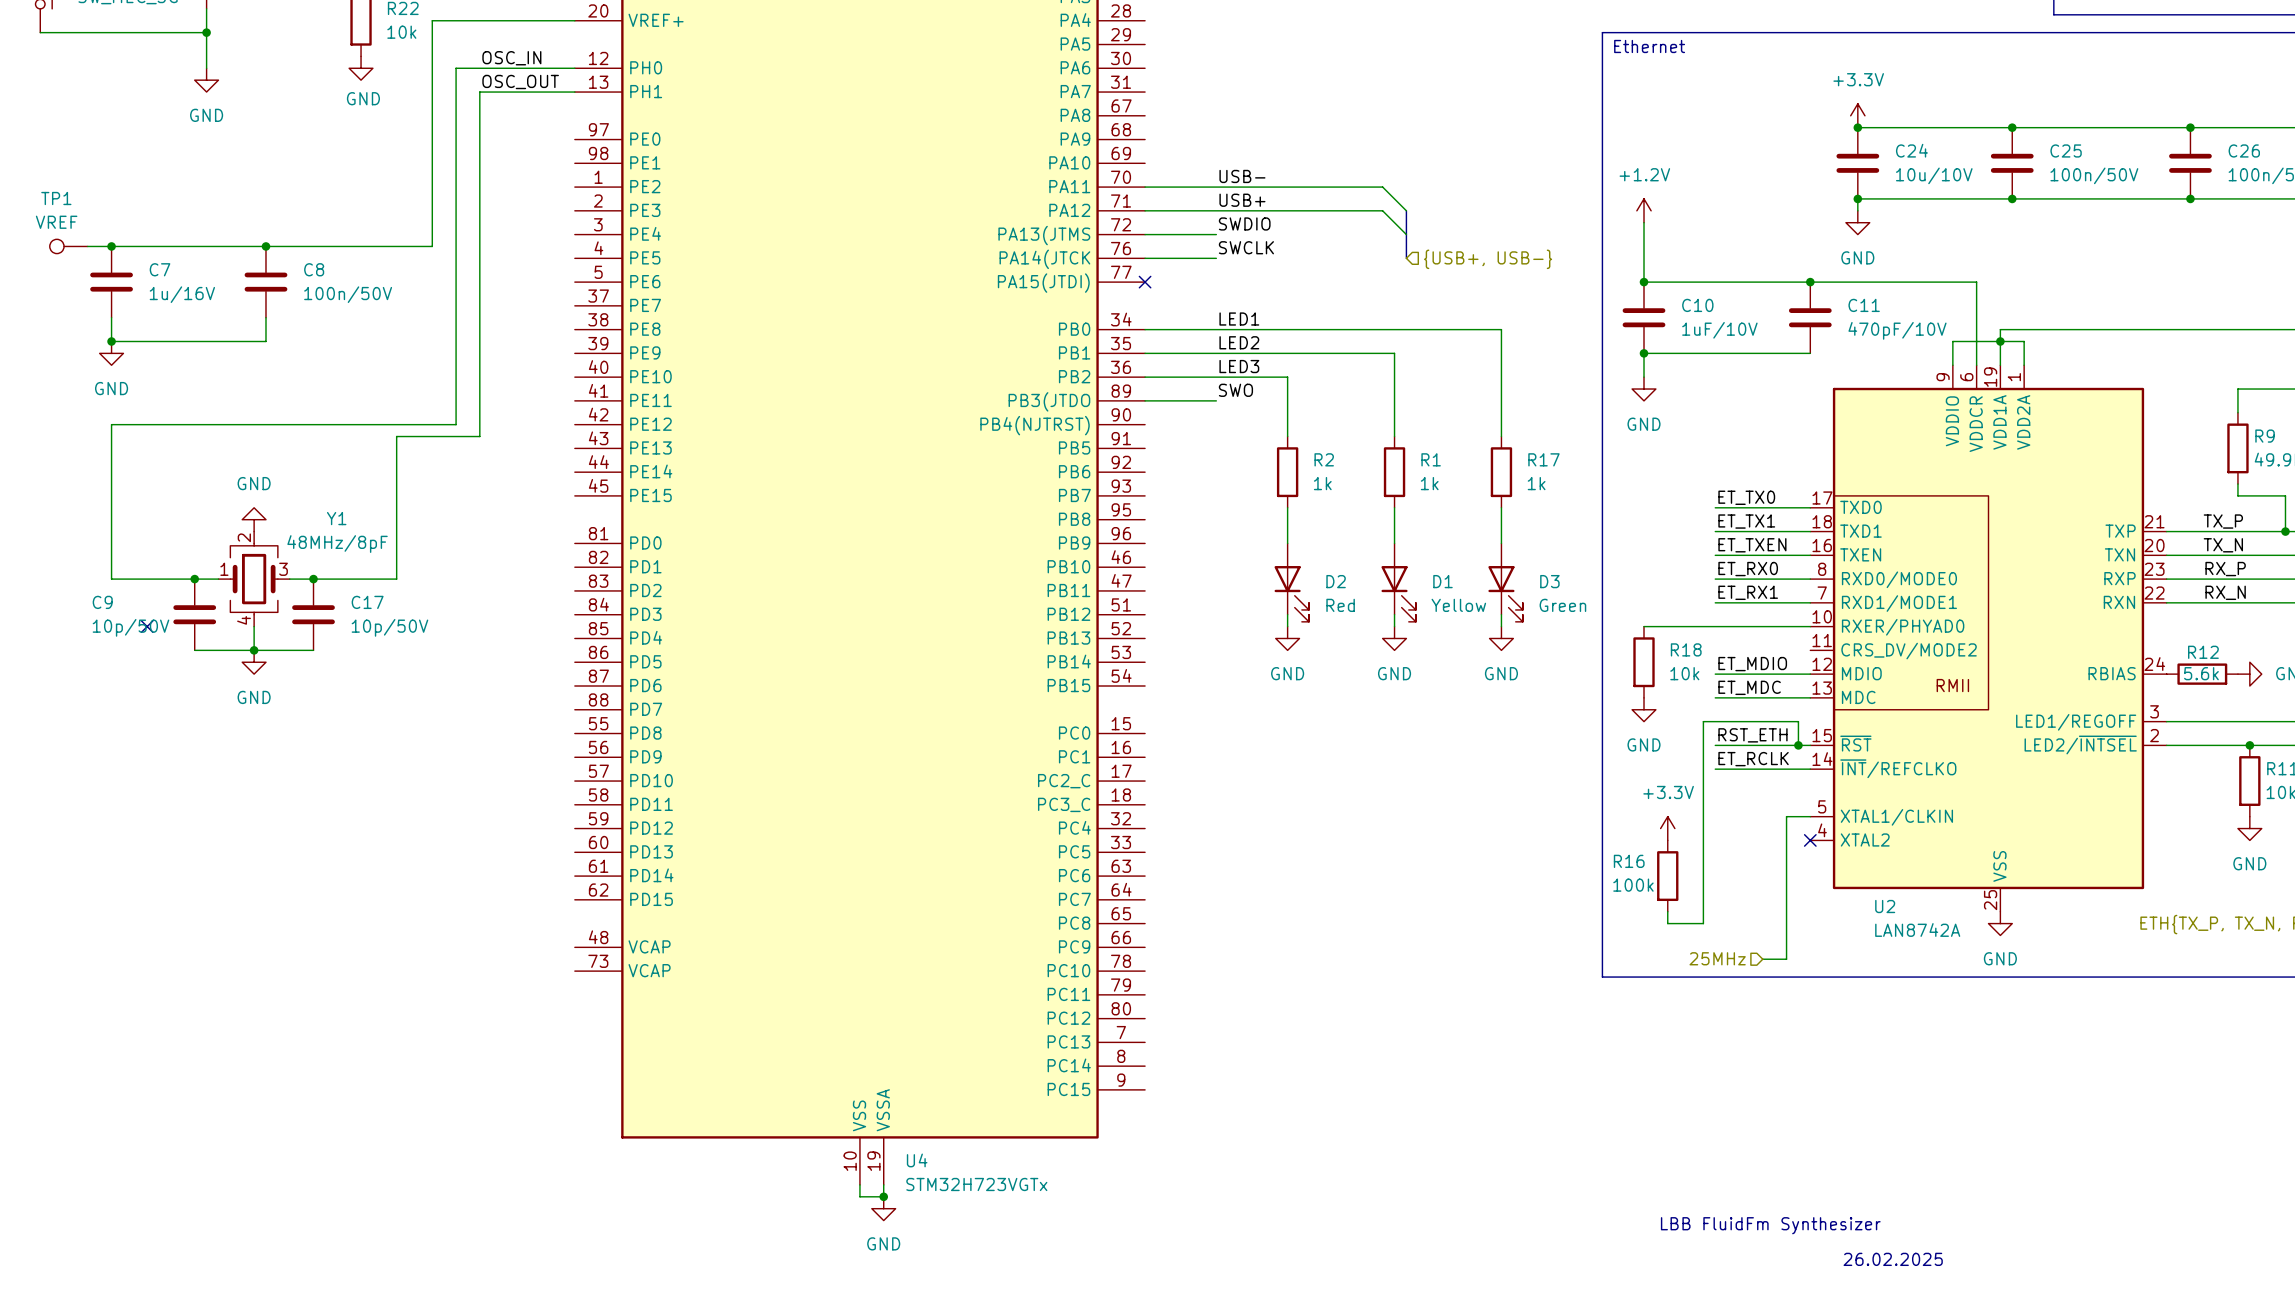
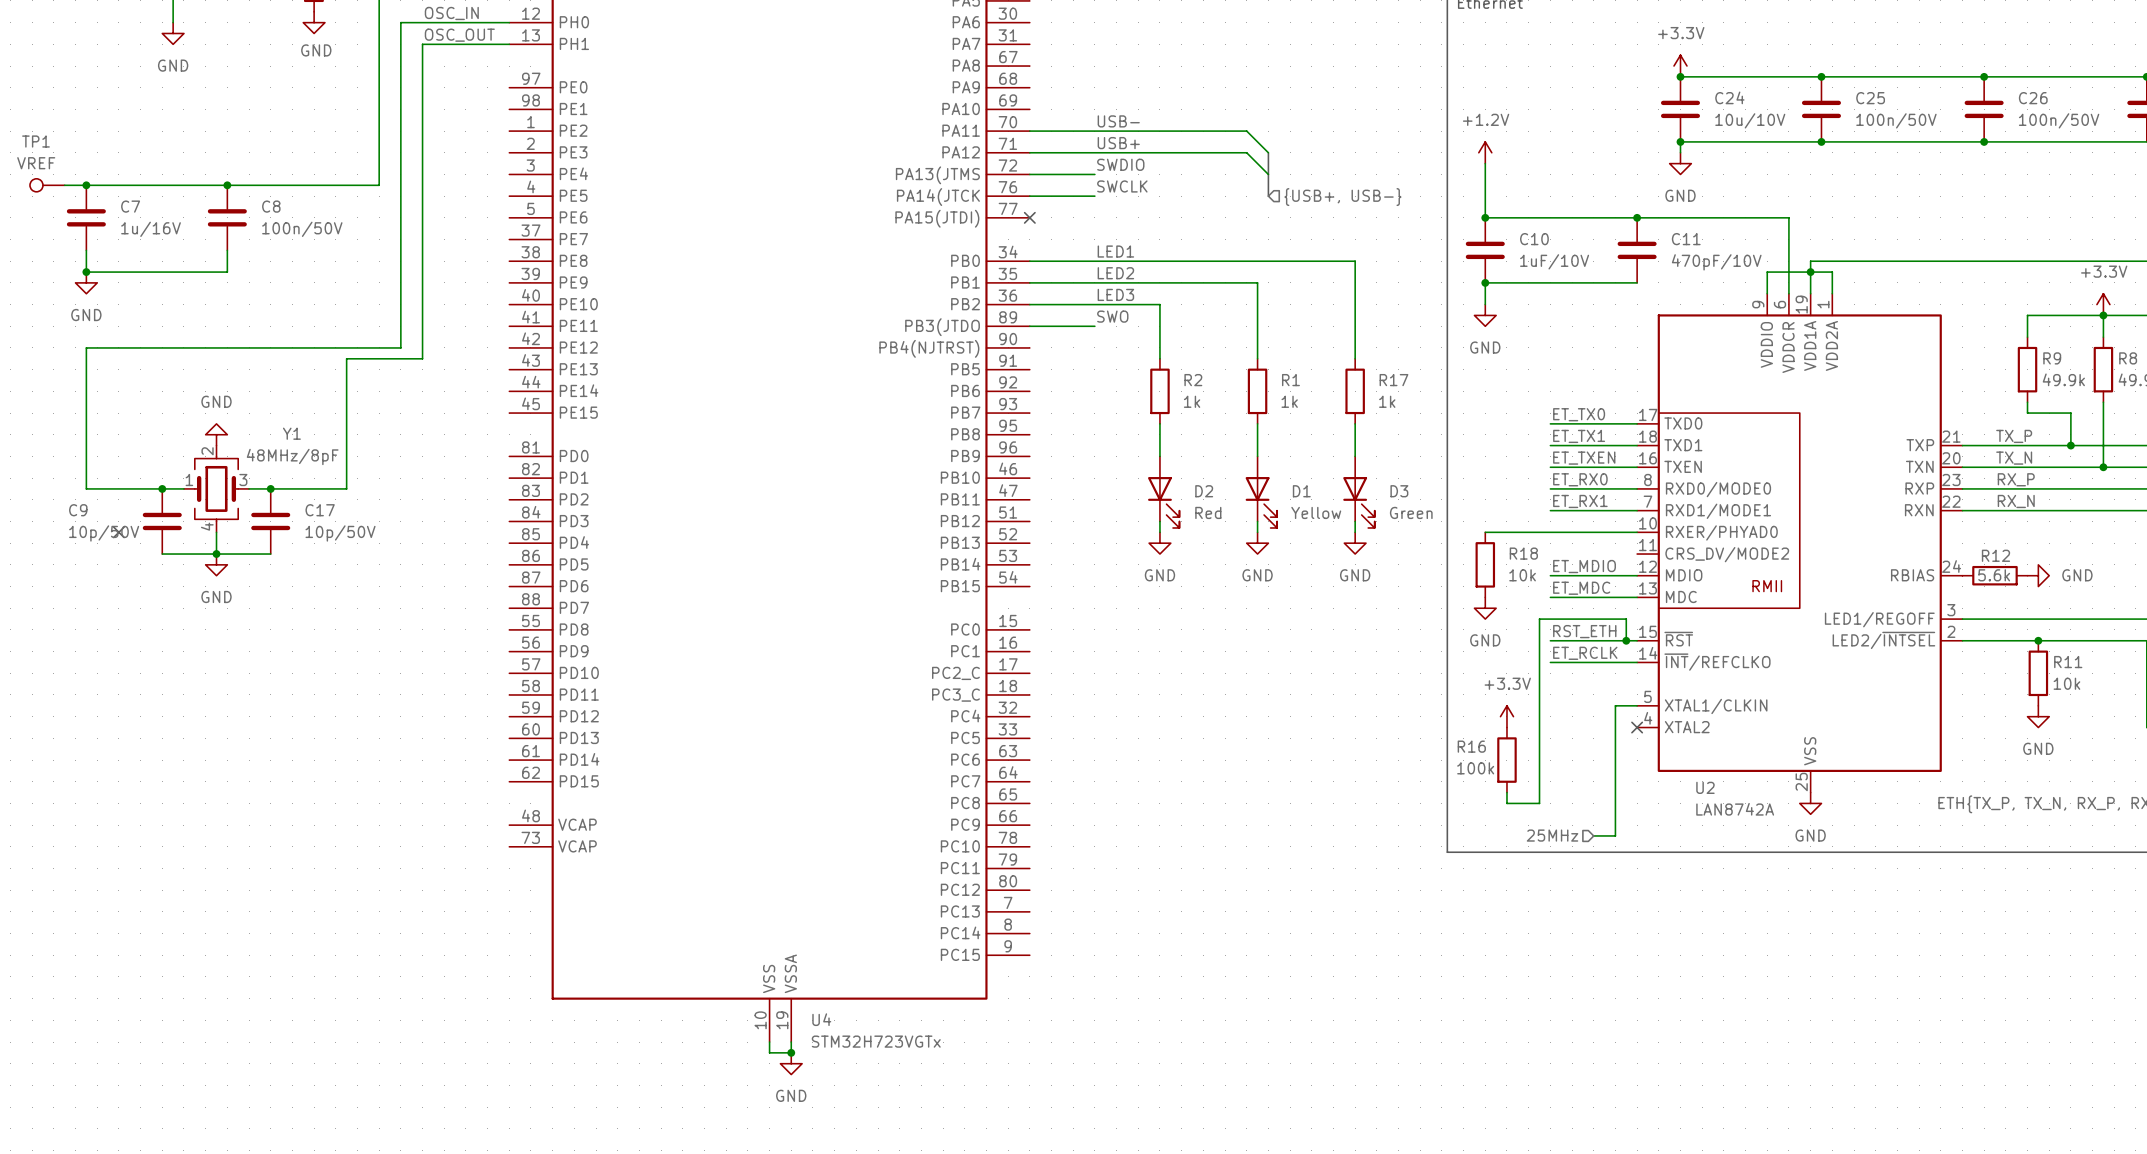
text: LBB FluidFm Synthesizer (1770, 1225) -> none
text: 26.02.2025 (1893, 1259) -> none

